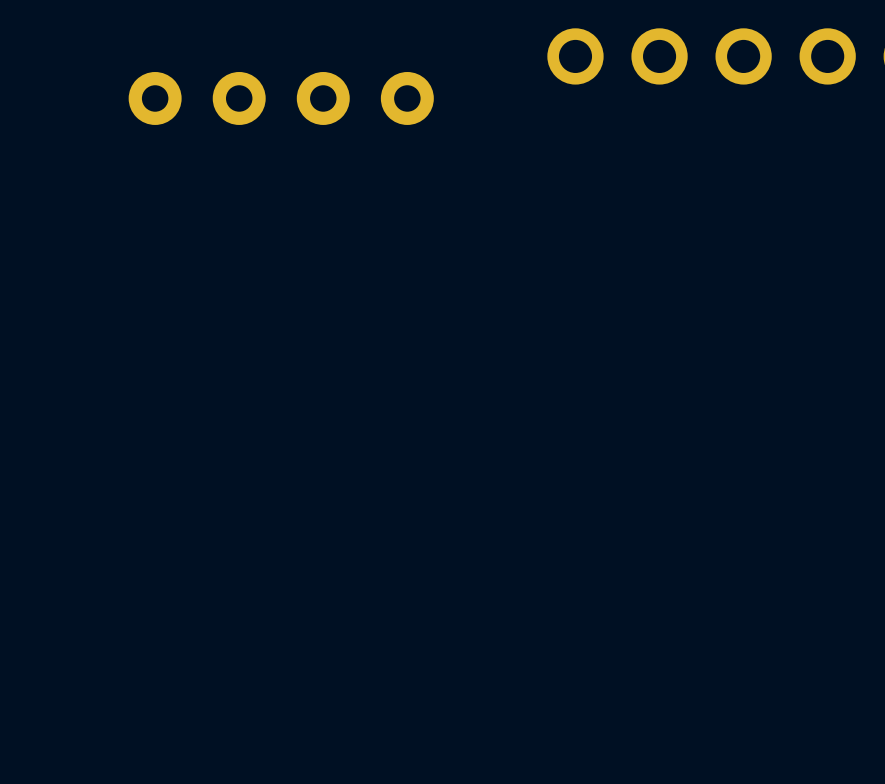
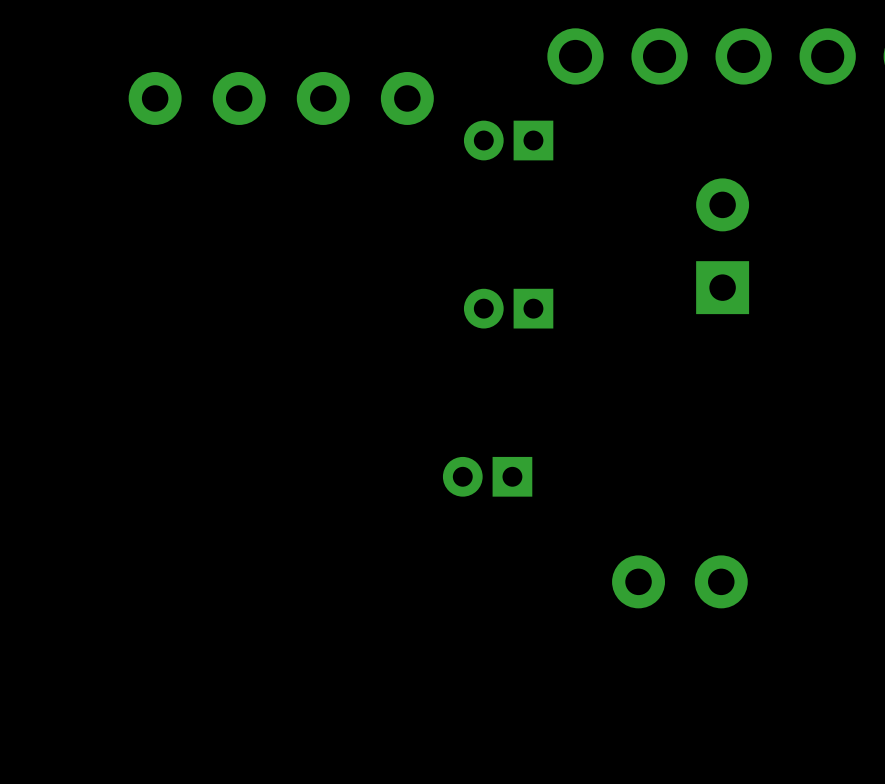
part: none -> (508, 140)
part: none -> (722, 246)
part: none -> (508, 308)
part: none -> (487, 476)
part: none -> (679, 581)

